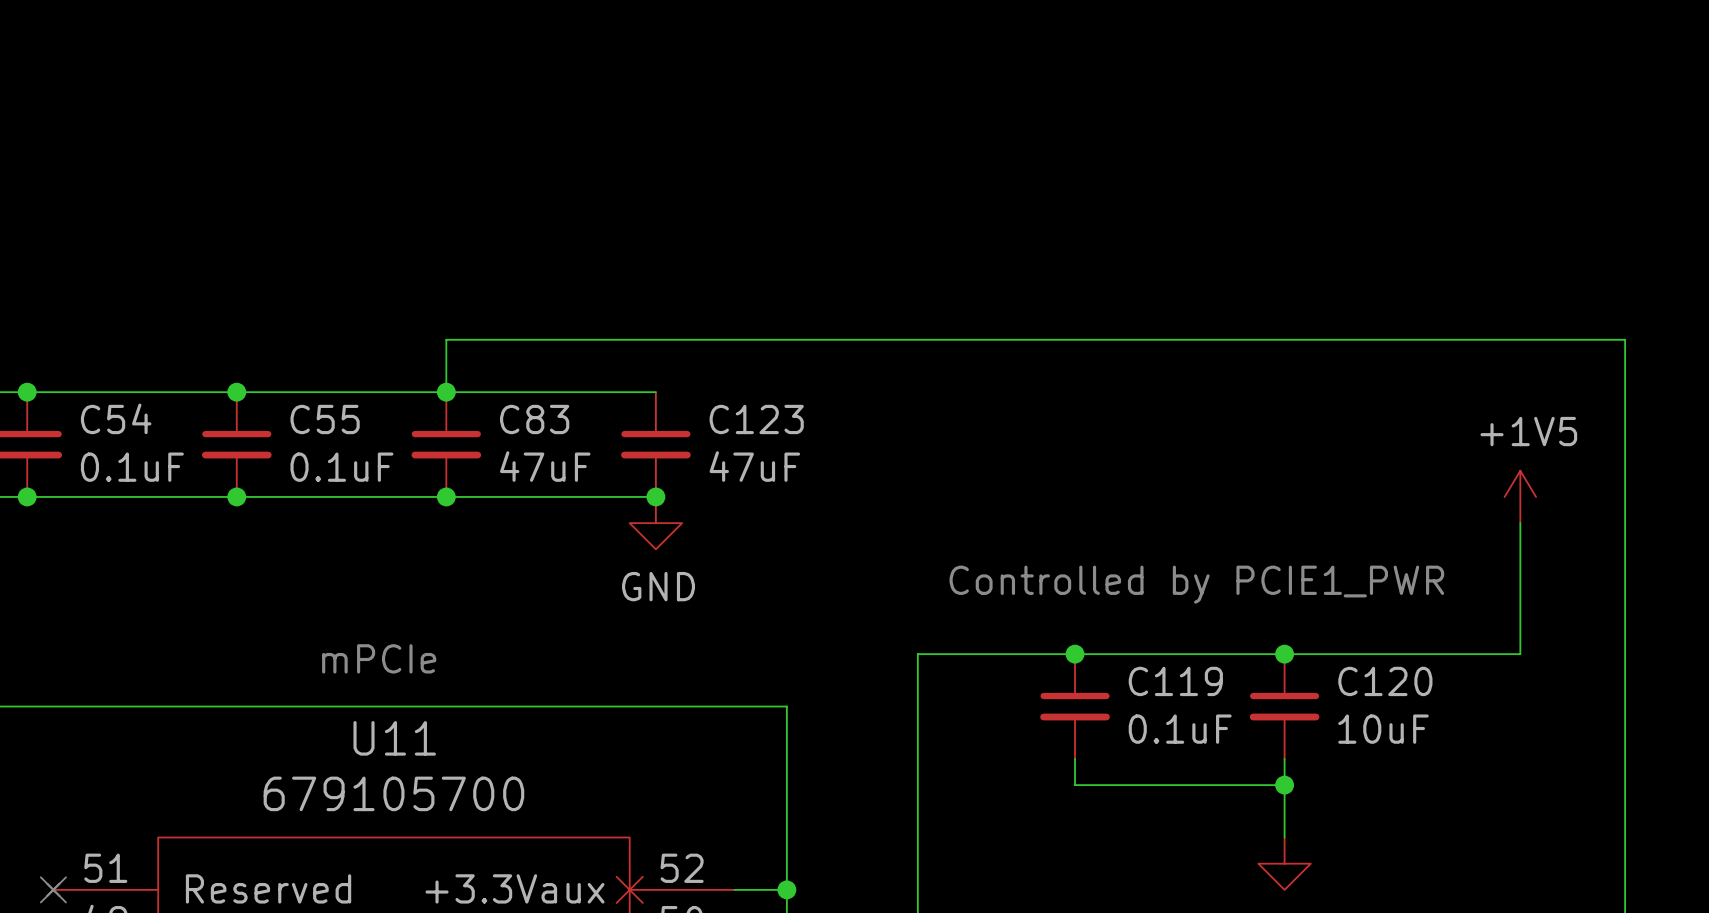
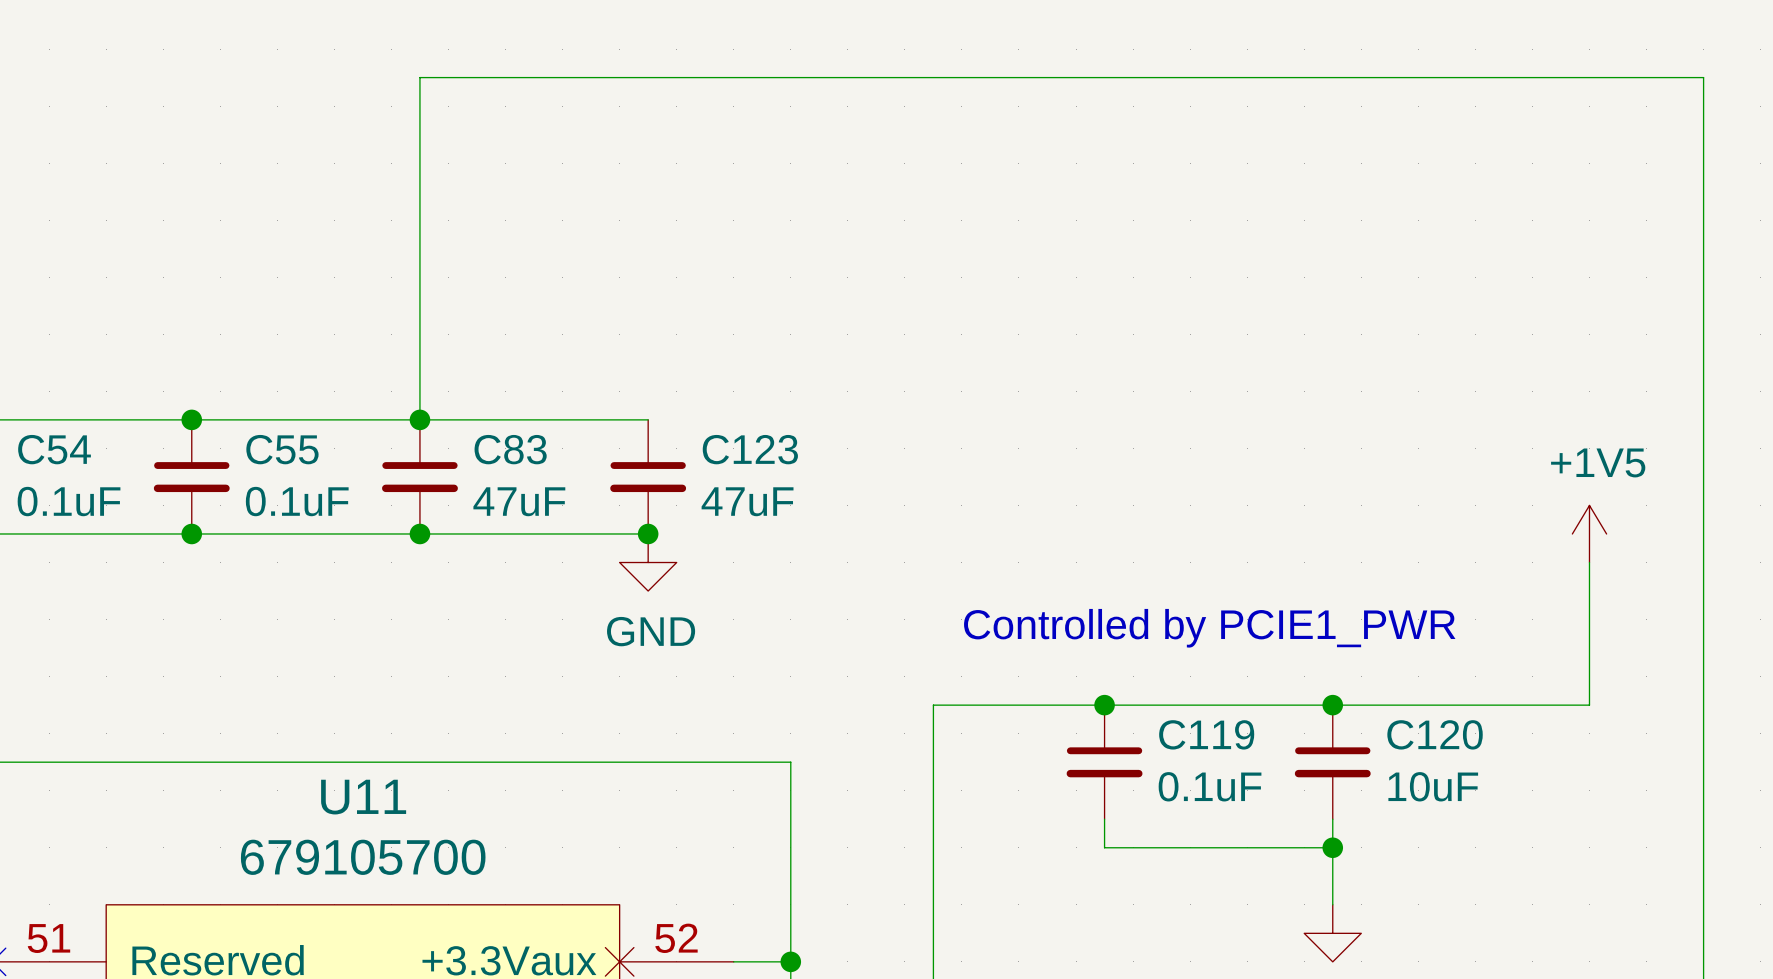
wire: (446, 339) (1625, 339) -> (419, 362) (419, 77) (1703, 77) (1703, 362)
text: mPCIe (379, 658) -> none

